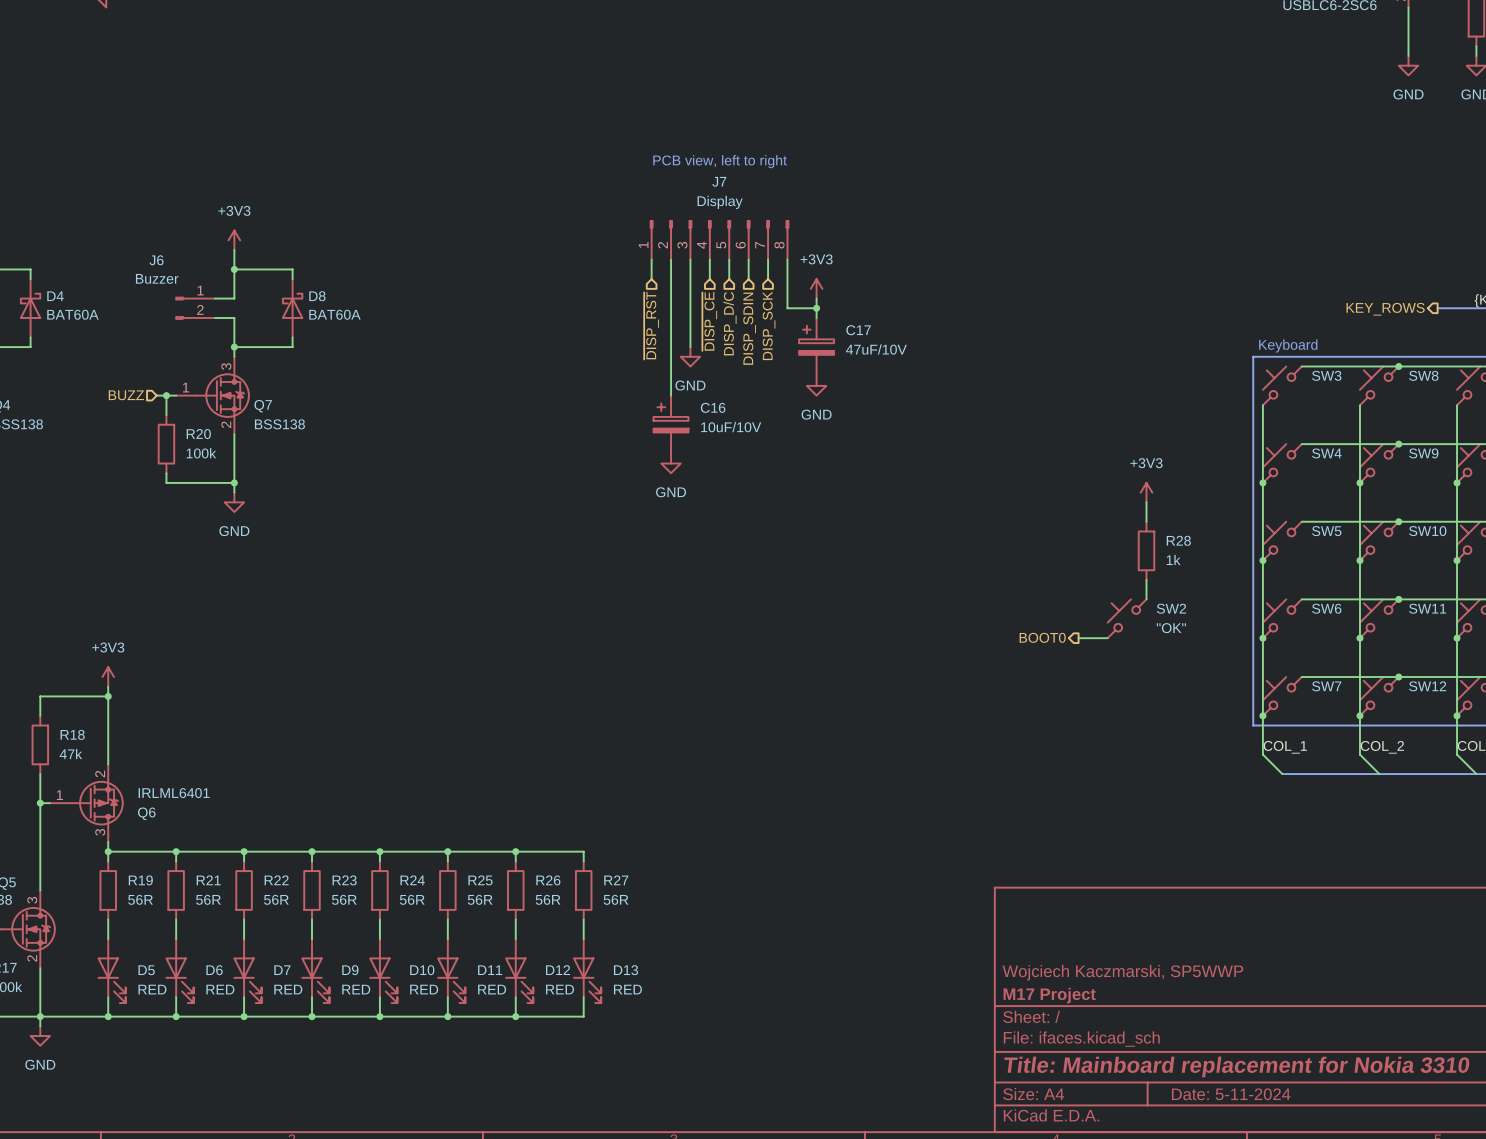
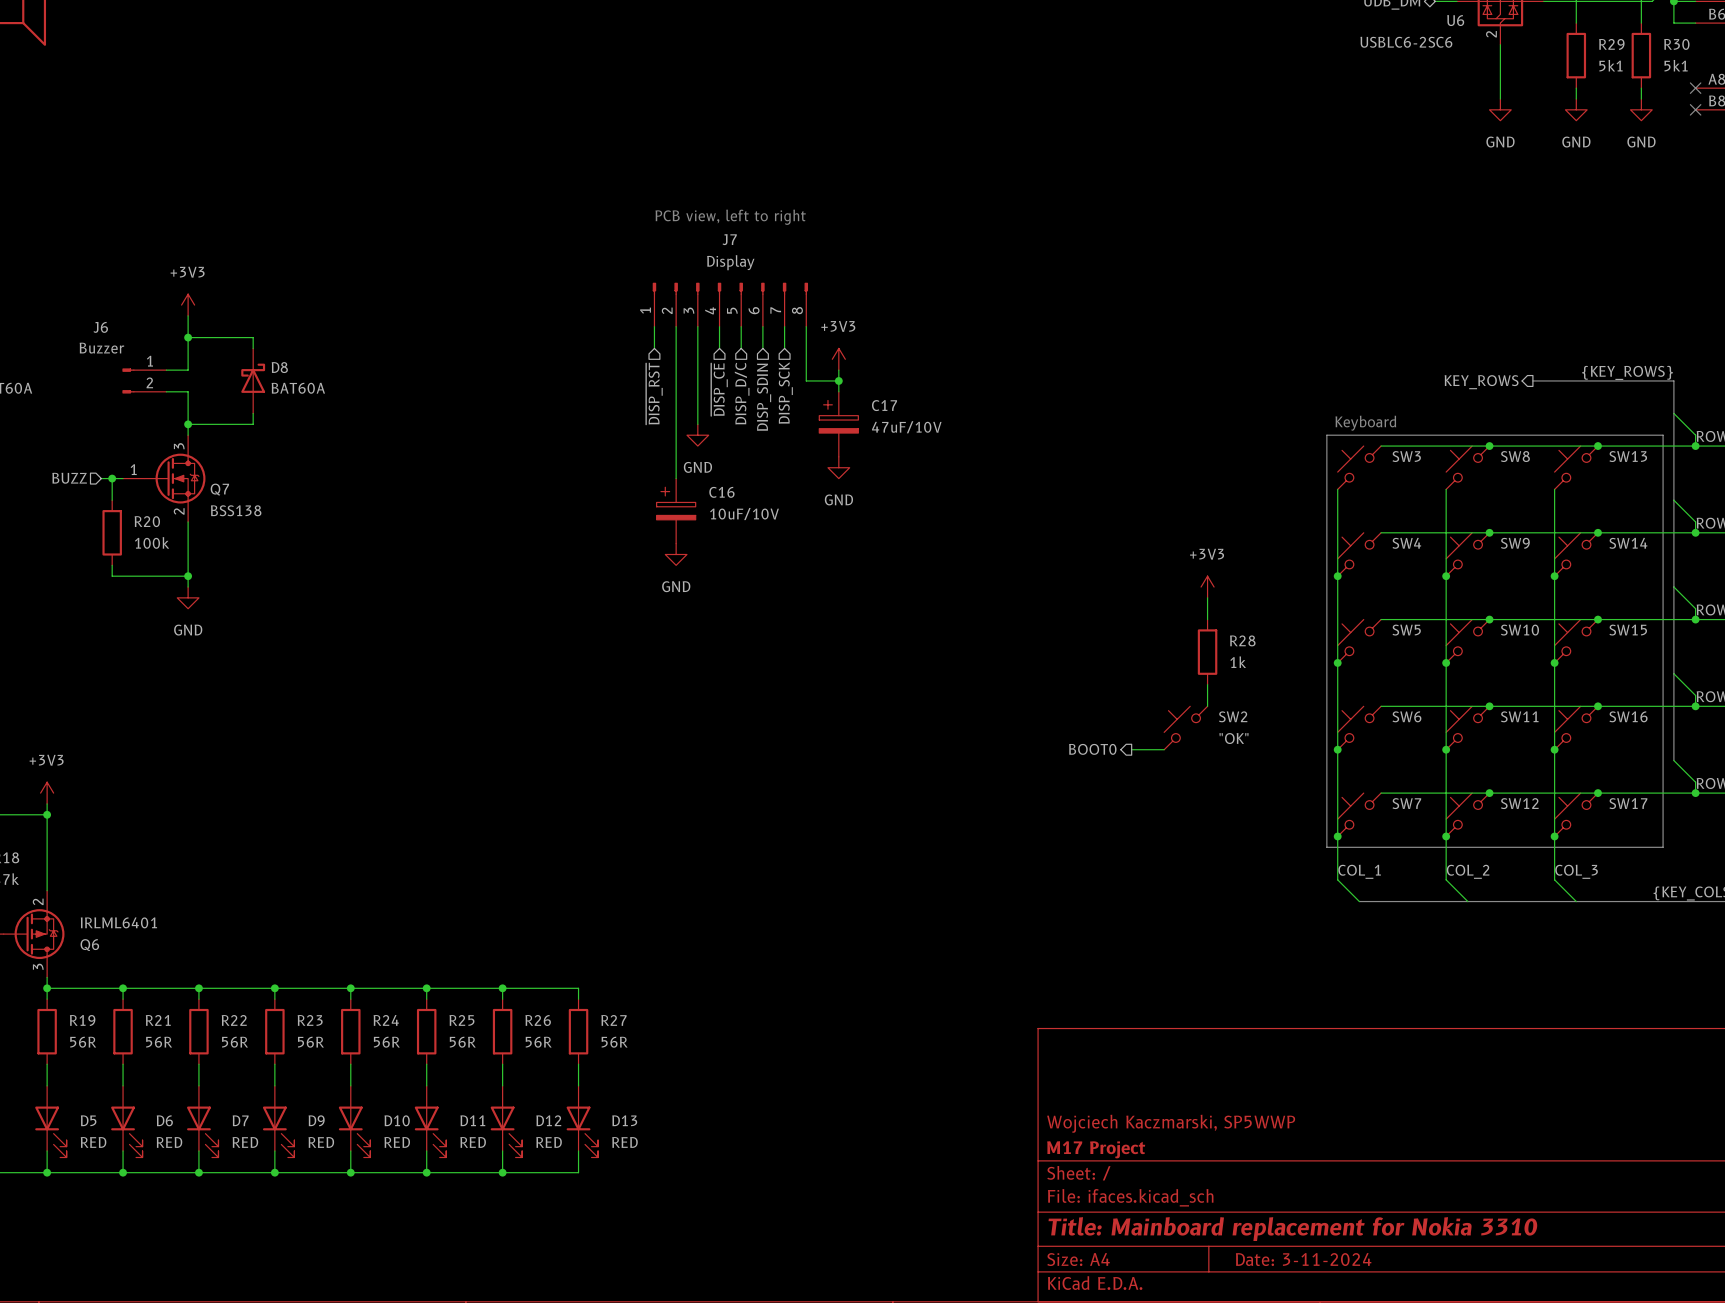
title block: Date: 5-11-2024 (1231, 1094) -> Date: 3-11-2024 (1303, 1259)

